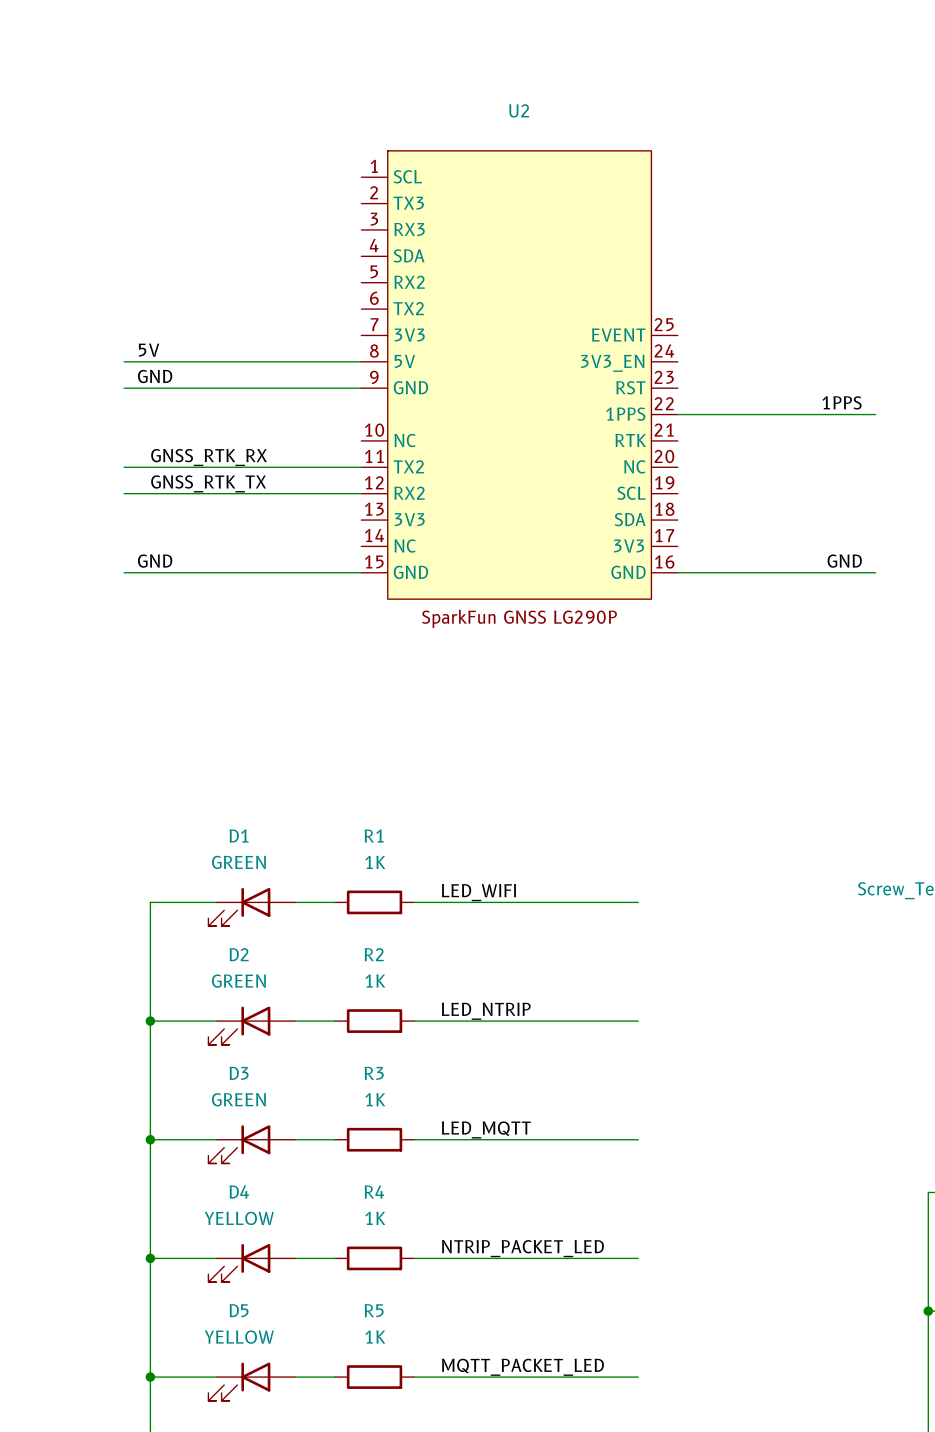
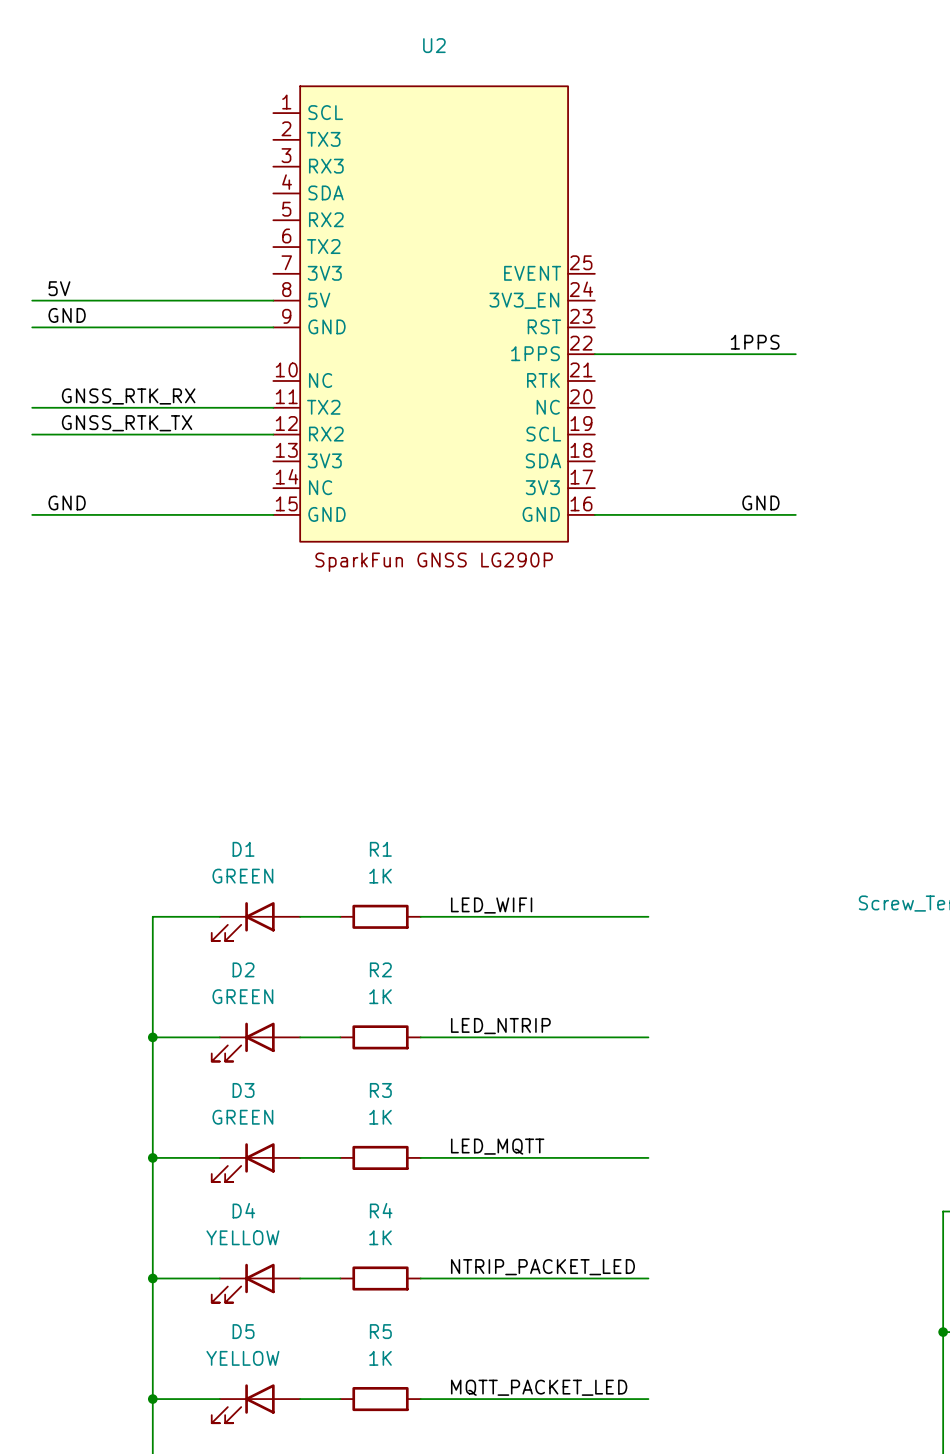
label: none -> GND (67, 315)
label position: 5V (149, 350) -> 5V (59, 288)
wire: (124, 361) (361, 361) -> (32, 300) (273, 300)
U2 position: (519, 375) -> (434, 314)
label: GND (155, 376) -> none
wire: (124, 388) (361, 388) -> (32, 327) (273, 327)
label position: 1PPS (842, 402) -> 1PPS (755, 342)
wire: (677, 414) (875, 414) -> (594, 354) (795, 354)
label position: GNSS_RTK_RX (209, 457) -> GNSS_RTK_RX (128, 396)
wire: (124, 467) (361, 467) -> (32, 407) (273, 407)
label position: GNSS_RTK_TX (208, 483) -> GNSS_RTK_TX (127, 423)
wire: (124, 493) (361, 493) -> (32, 434) (273, 434)
label: none -> GND (67, 502)
label: GND (155, 561) -> none
label position: GND (844, 561) -> GND (760, 502)
wire: (124, 572) (361, 572) -> (32, 514) (273, 514)
wire: (677, 572) (875, 572) -> (594, 514) (795, 514)

